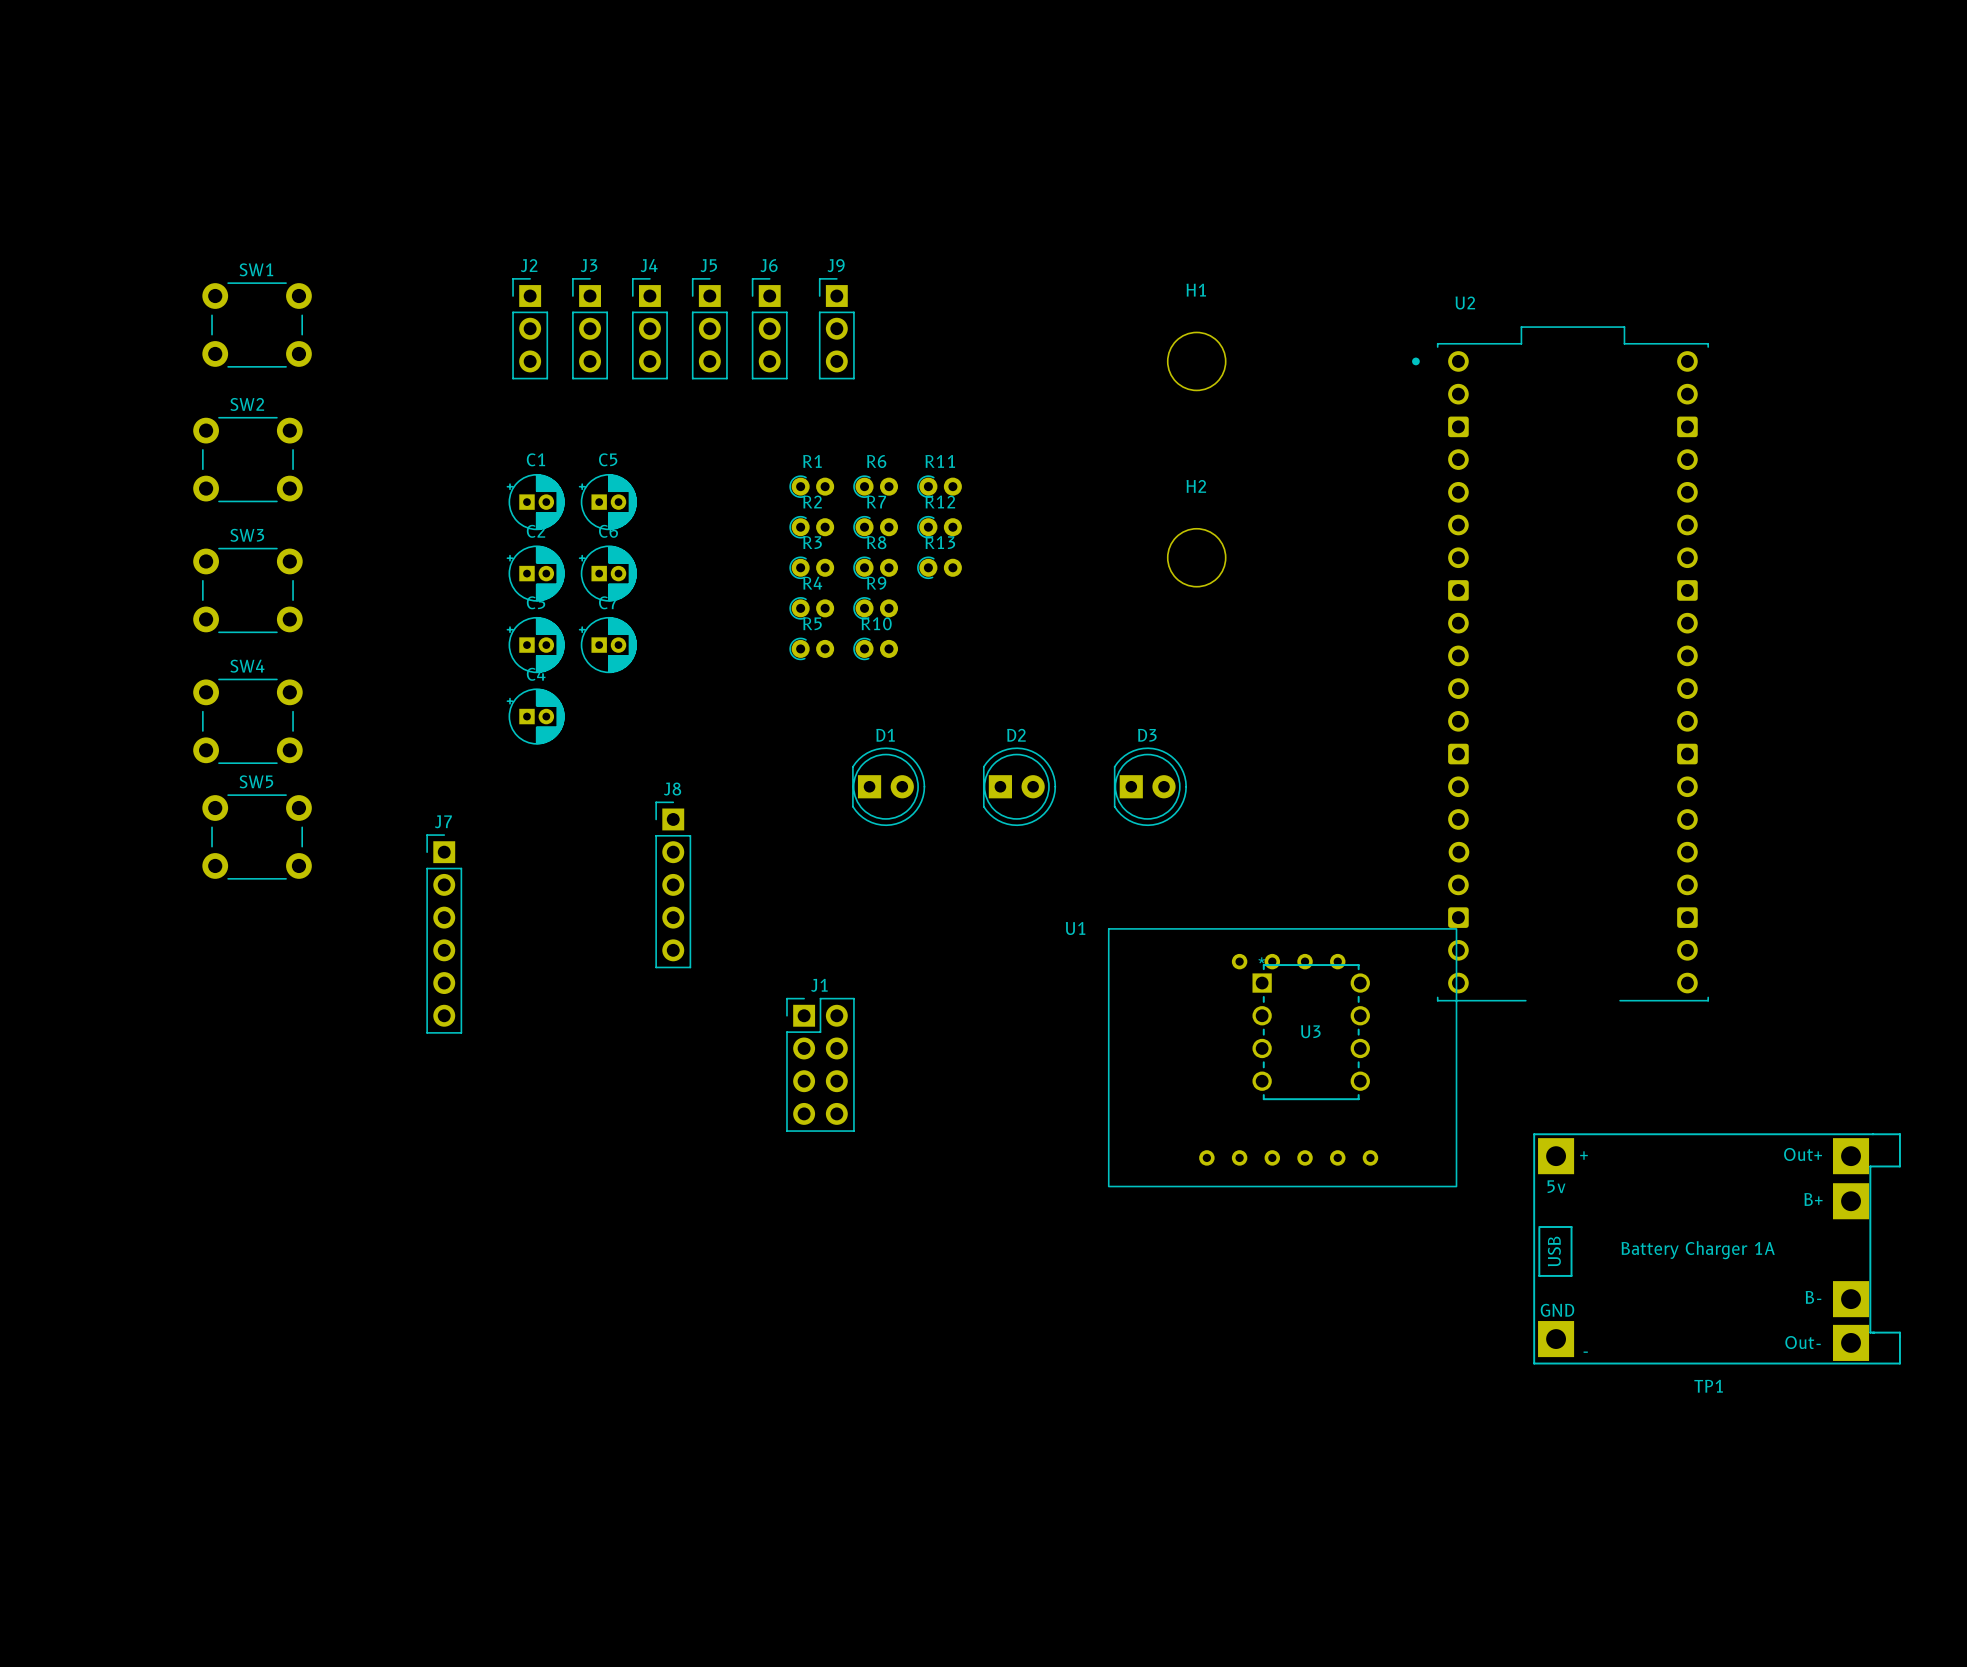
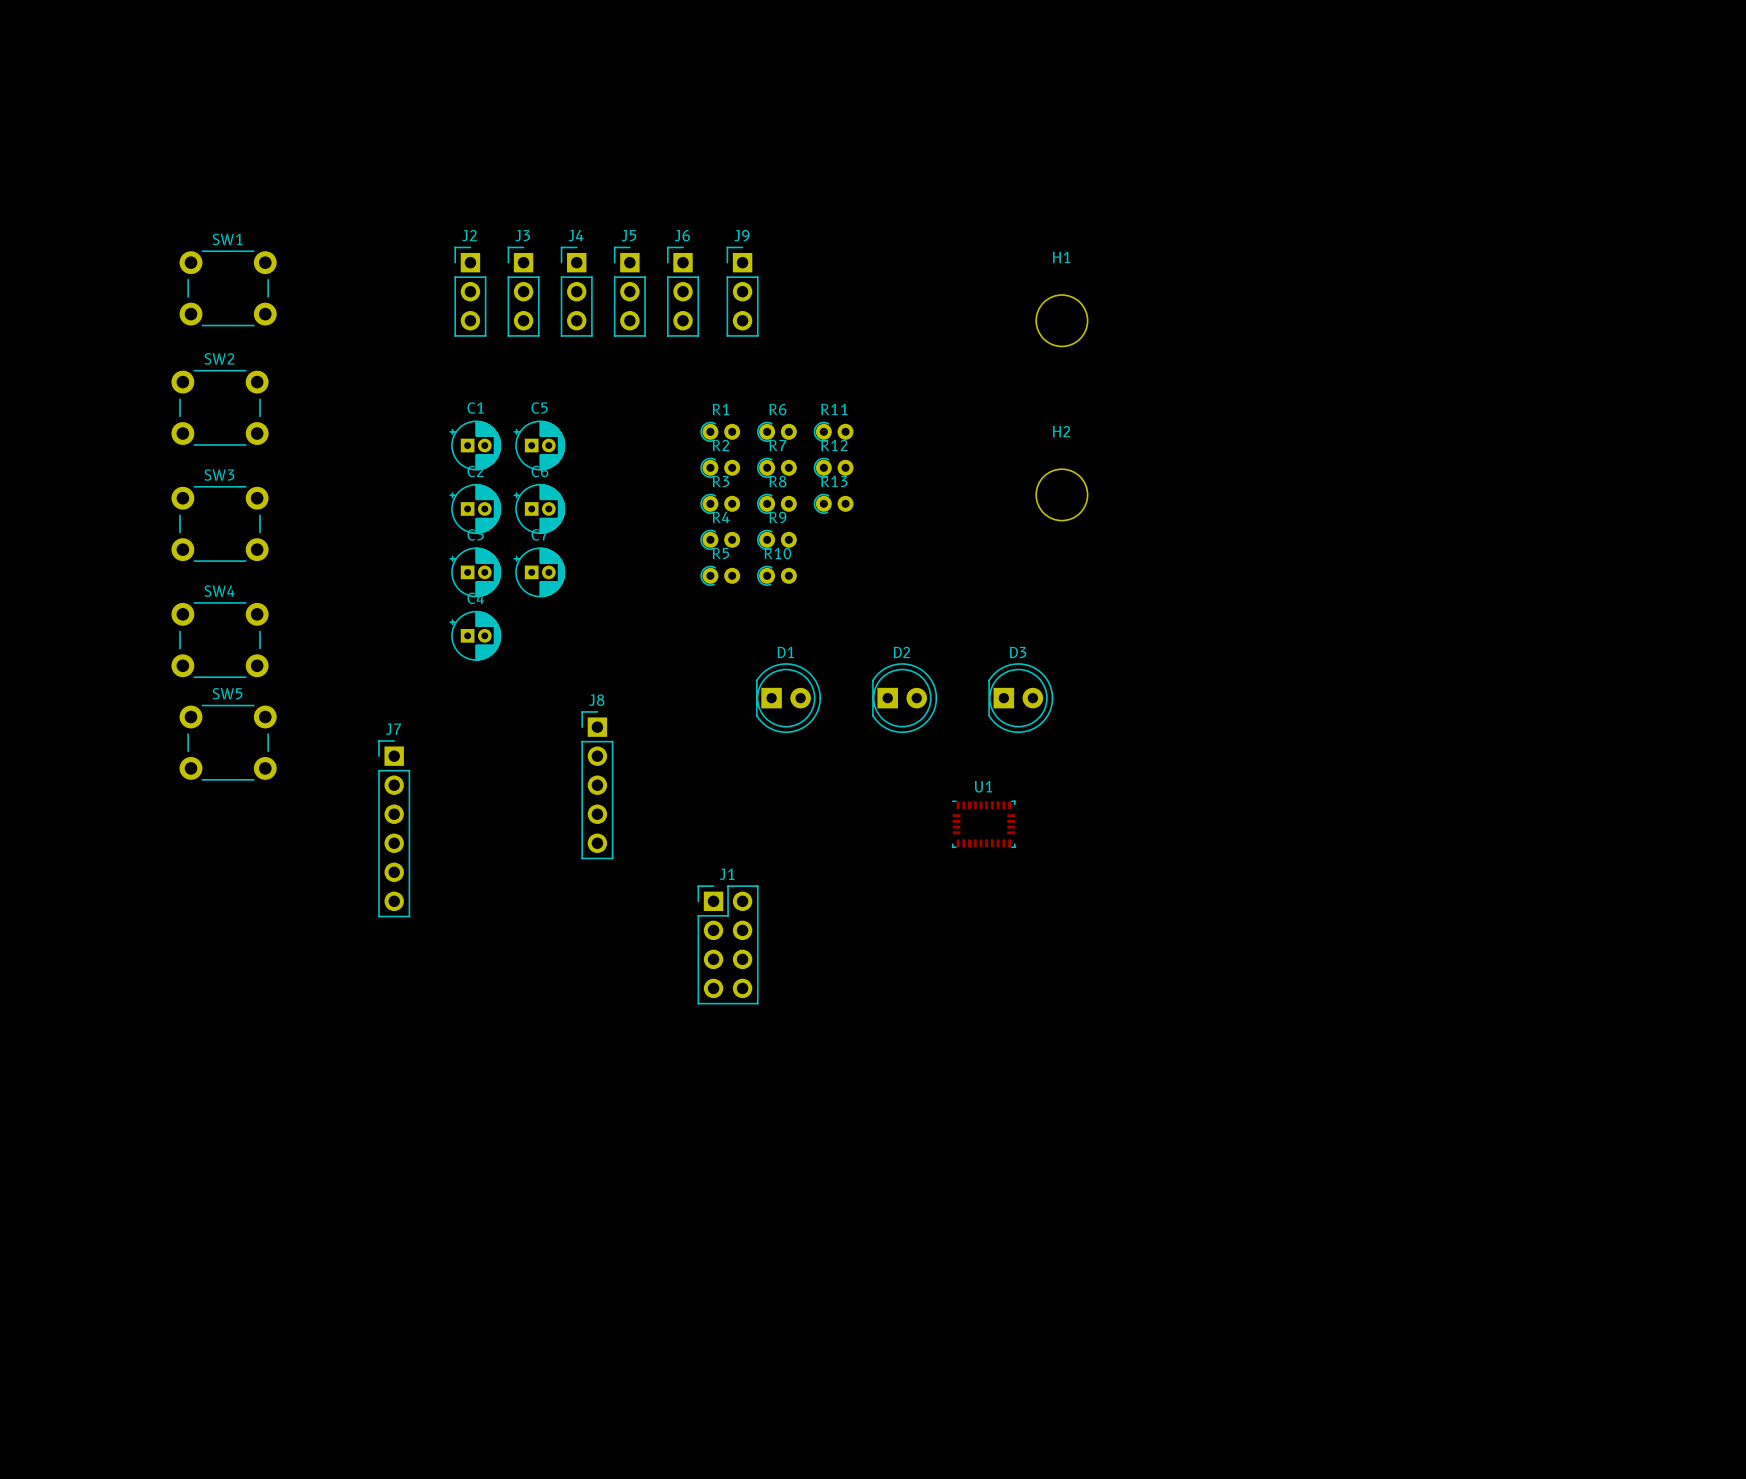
U2: (1560, 663) -> none
U1 name position: U1 (1075, 928) -> U1 (983, 786)
U1 footprint: [1108, 928, 1458, 1188] -> [952, 800, 1016, 848]
U3: (1311, 1032) -> none
TP1: (1717, 1248) -> none

